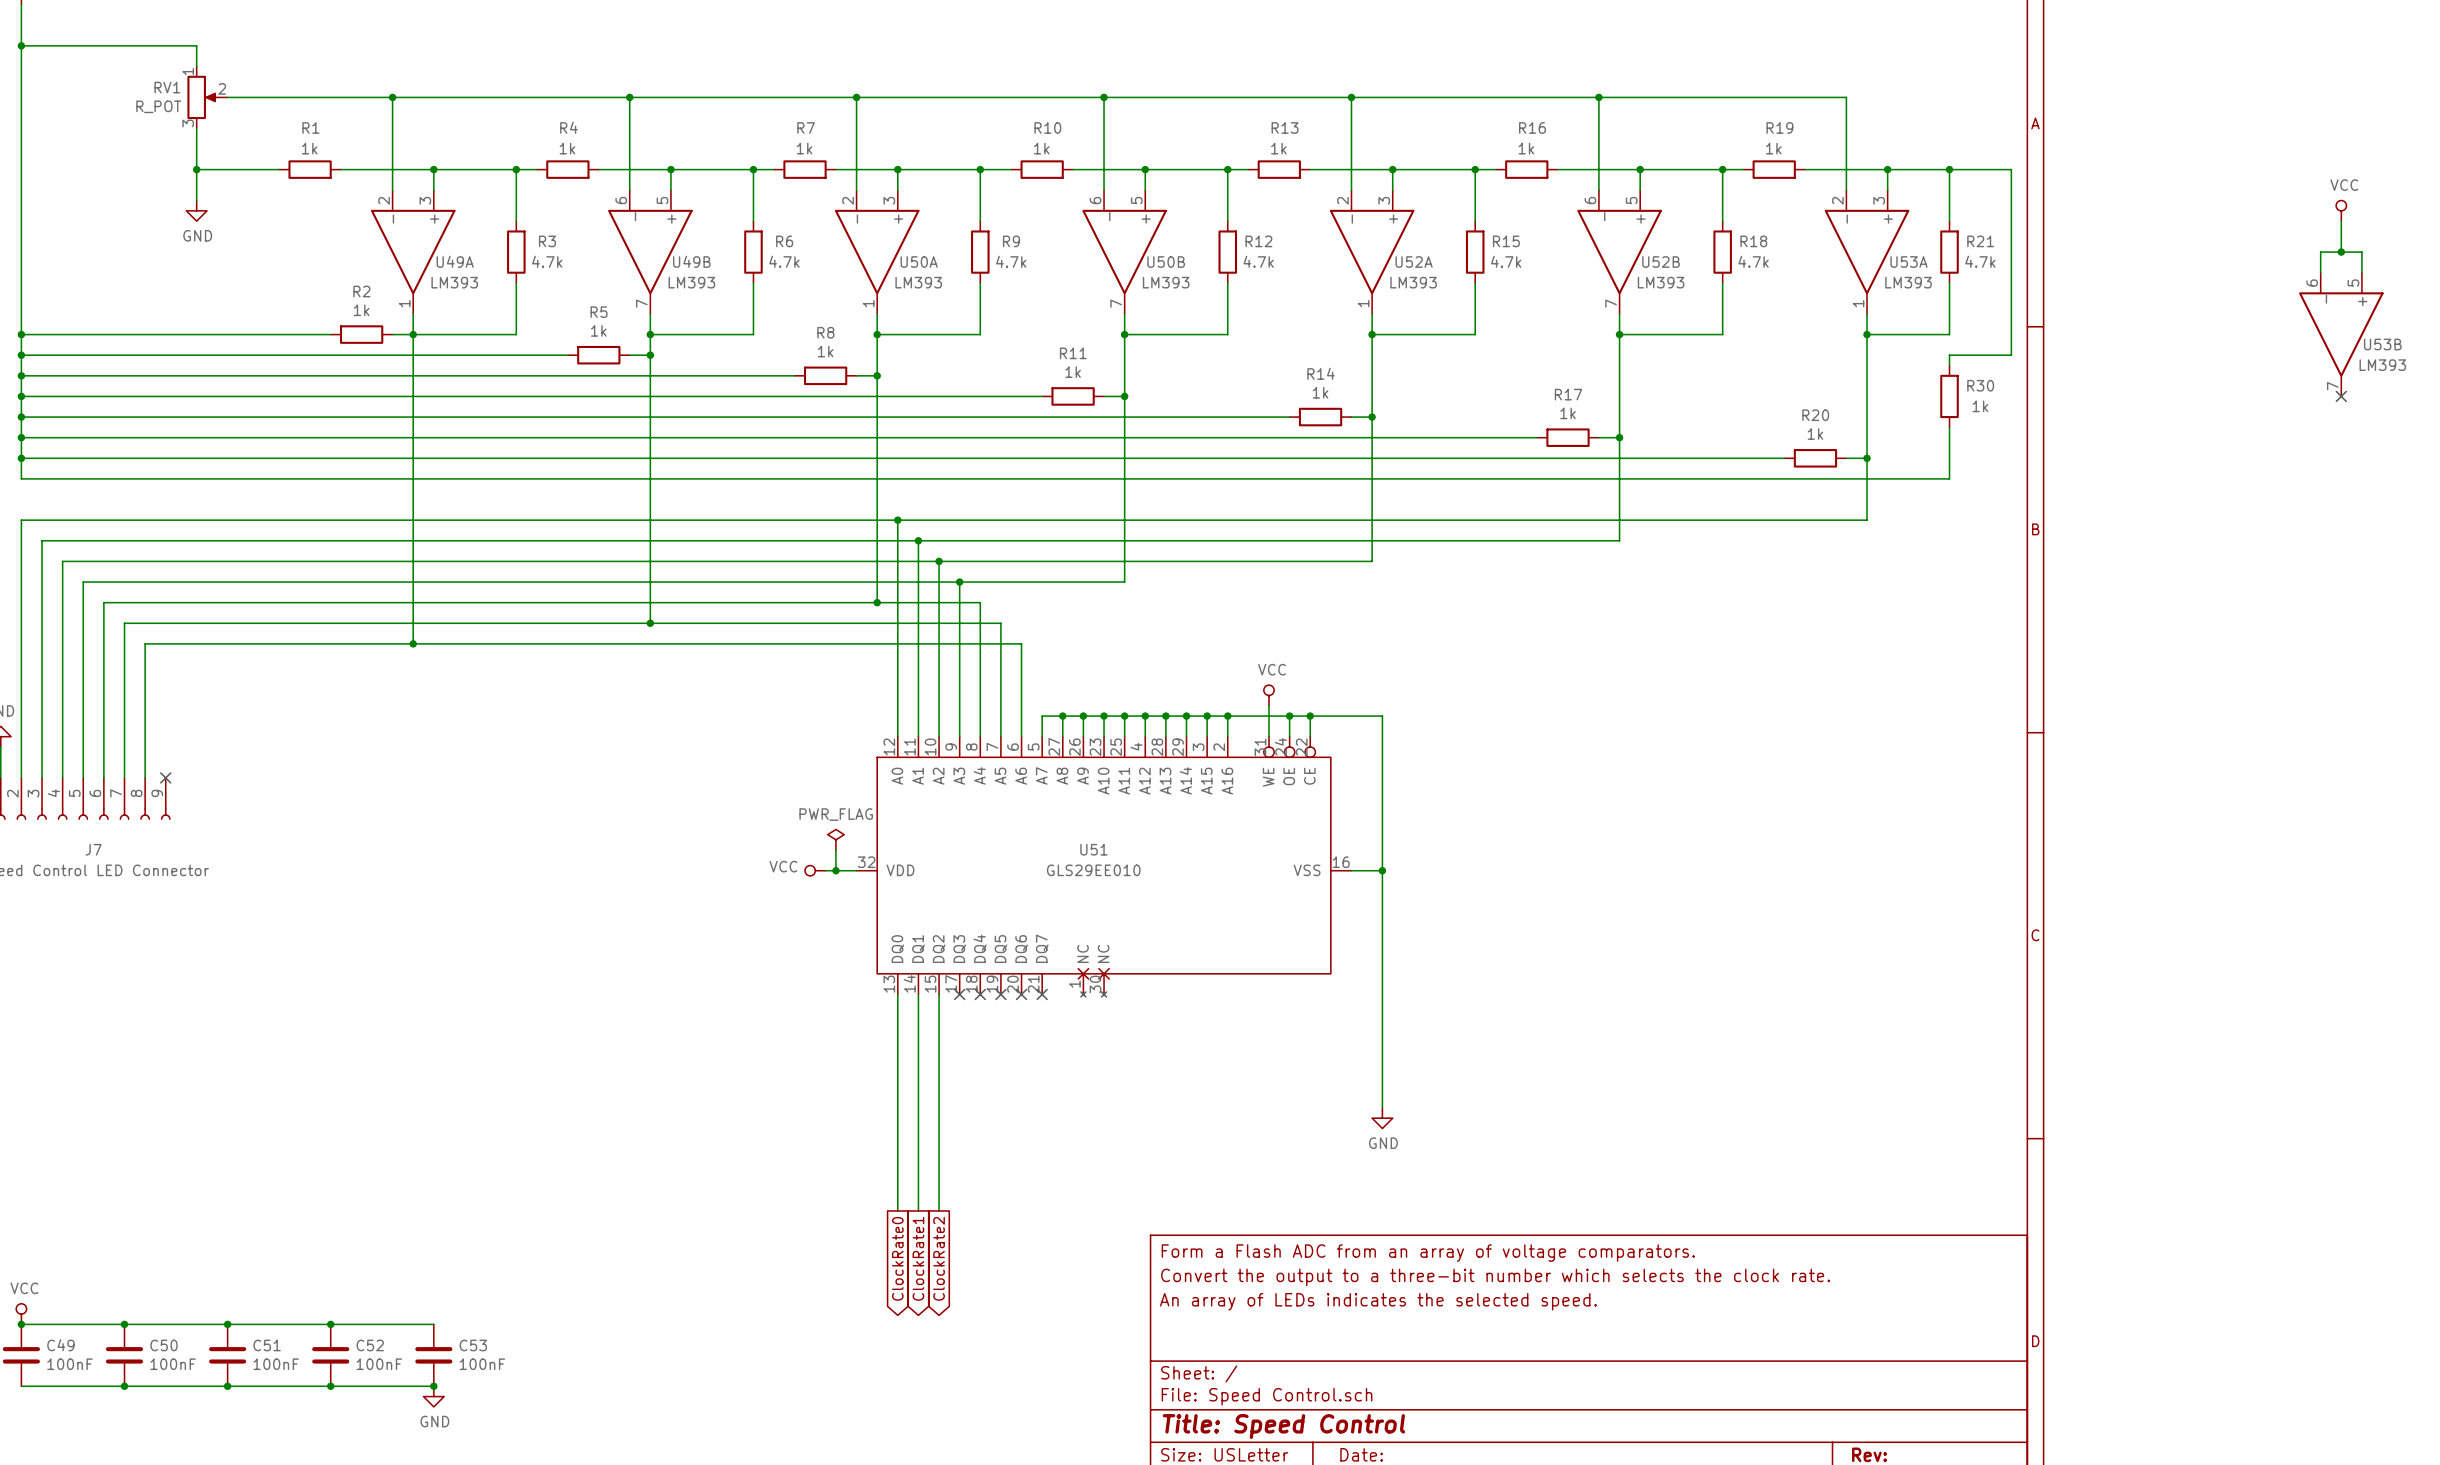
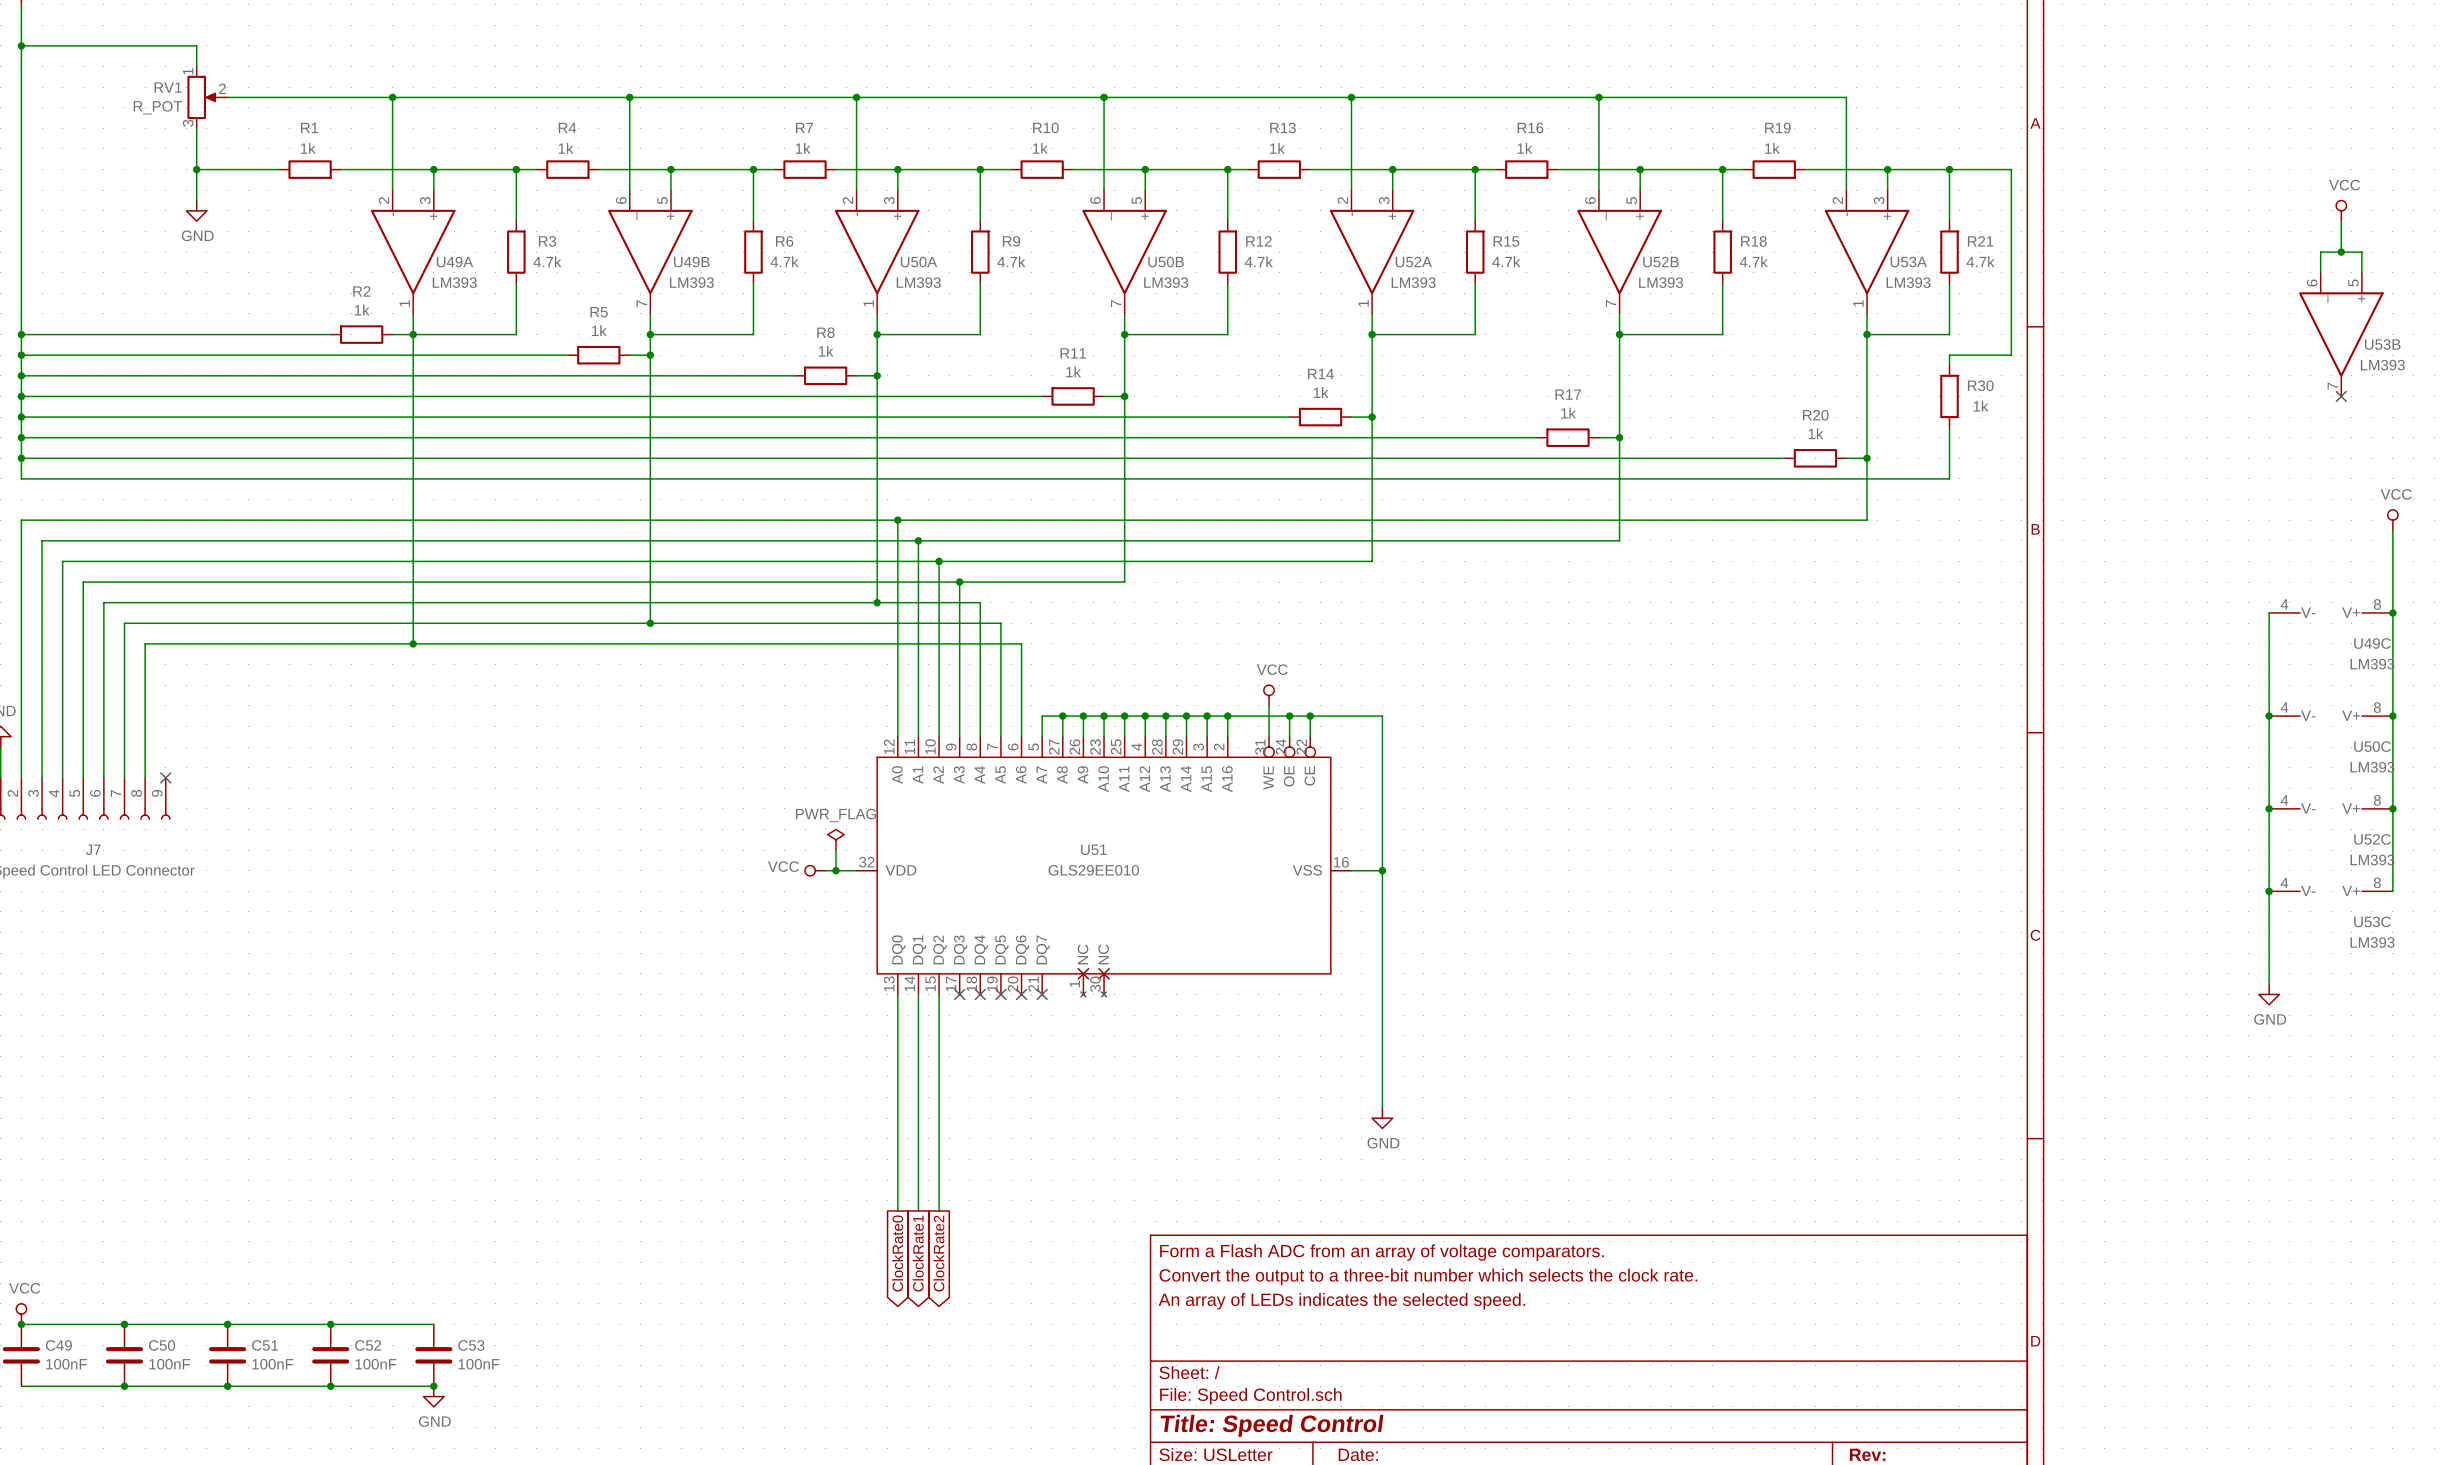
power symbol: none -> VCC (2392, 520)
wire: none -> (2392, 530) (2392, 891)
wire: none -> (2269, 612) (2269, 984)
U49C: none -> LM393 (2331, 612)
junction: none -> (2392, 612)
junction: none -> (2269, 716)
U50C: none -> LM393 (2331, 716)
junction: none -> (2392, 716)
junction: none -> (2269, 808)
U52C: none -> LM393 (2331, 808)
junction: none -> (2392, 808)
junction: none -> (2269, 891)
U53C: none -> LM393 (2331, 891)
power symbol: none -> GND (2269, 994)

